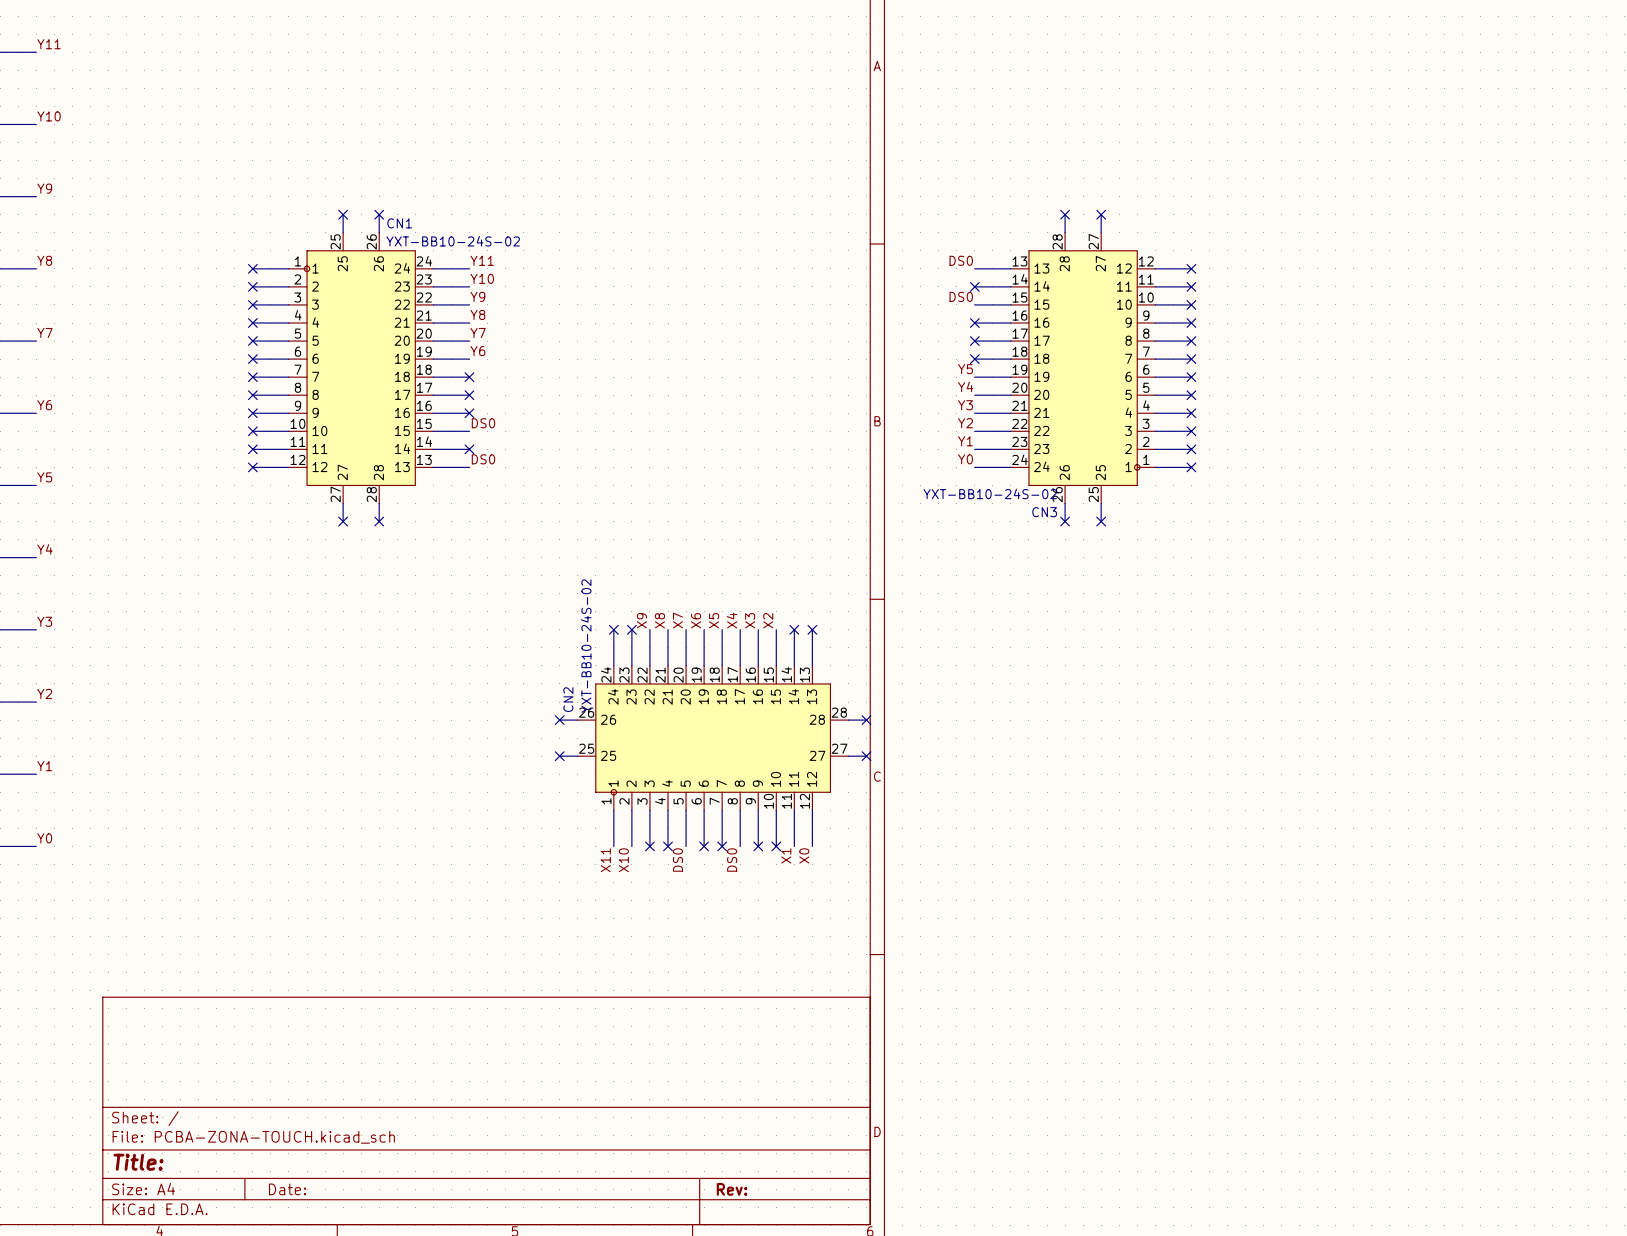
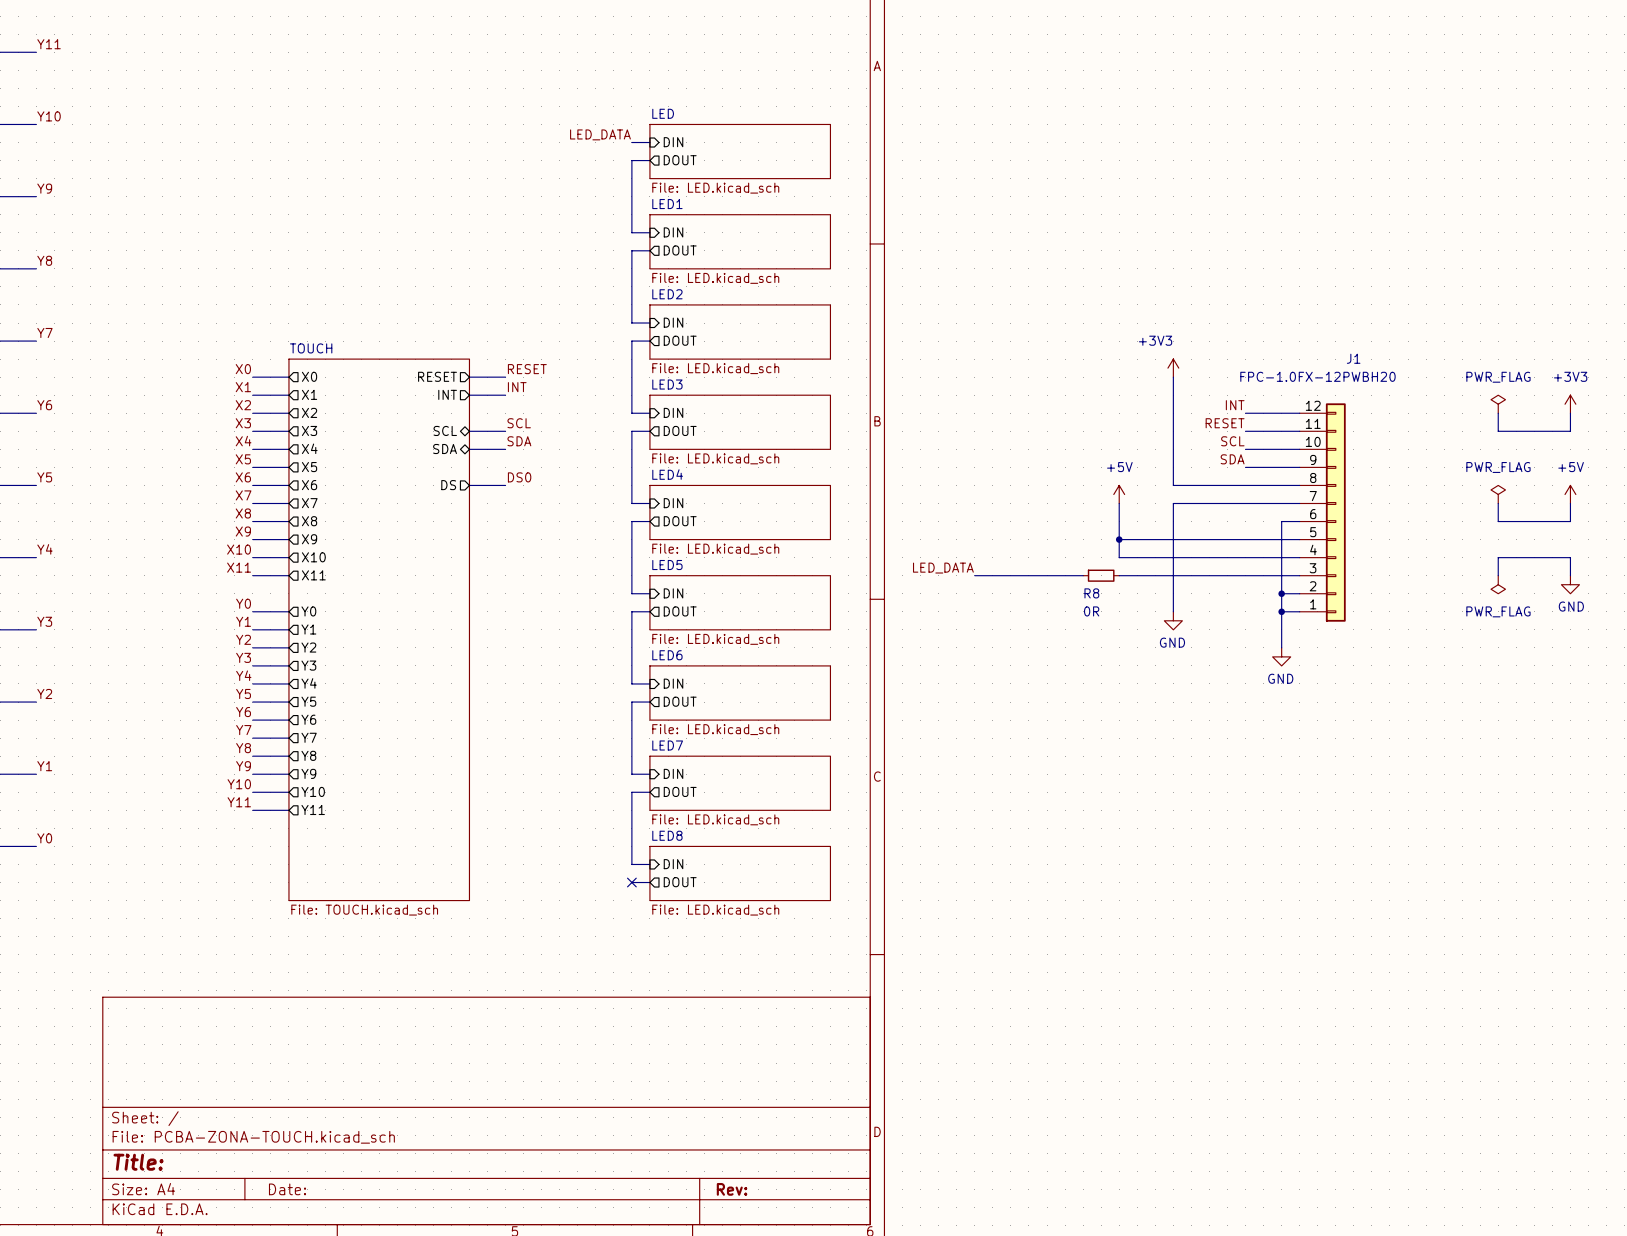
label: none -> LED_DATA (600, 134)
wire: none -> (631, 142) (649, 142)
sheet pin: none -> DIN (673, 142)
sheet LED: none -> File: LED.kicad_sch (740, 151)
wire: none -> (649, 160) (631, 160) (631, 232) (649, 232)
sheet pin: none -> DOUT (680, 160)
wire: (343, 214) (343, 232) -> none
no-connect mark: (343, 214) -> none
wire: (379, 214) (379, 232) -> none
no-connect mark: (379, 214) -> none
wire: (1065, 214) (1065, 232) -> none
no-connect mark: (1065, 214) -> none
wire: (1101, 214) (1101, 232) -> none
no-connect mark: (1101, 214) -> none
sheet pin: none -> DIN (673, 232)
sheet LED1: none -> File: LED.kicad_sch (740, 241)
wire: none -> (649, 250) (631, 250) (631, 323) (649, 323)
sheet pin: none -> DOUT (680, 250)
label: Y11 (482, 260) -> none
label: DS0 (961, 260) -> none
wire: (252, 268) (288, 268) -> none
no-connect mark: (252, 268) -> none
wire: (433, 268) (469, 268) -> none
wire: (974, 268) (1010, 268) -> none
wire: (1155, 268) (1191, 268) -> none
no-connect mark: (1191, 268) -> none
label: Y10 (482, 278) -> none
wire: (252, 286) (288, 286) -> none
no-connect mark: (252, 286) -> none
wire: (433, 286) (469, 286) -> none
wire: (974, 286) (1010, 286) -> none
no-connect mark: (974, 286) -> none
wire: (1155, 286) (1191, 286) -> none
no-connect mark: (1191, 286) -> none
label: Y9 (477, 296) -> none
label: DS0 (961, 296) -> none
wire: (252, 304) (288, 304) -> none
no-connect mark: (252, 304) -> none
wire: (433, 304) (469, 304) -> none
wire: (974, 304) (1010, 304) -> none
wire: (1155, 304) (1191, 304) -> none
no-connect mark: (1191, 304) -> none
label: Y8 (477, 314) -> none
sheet pin: none -> DIN (673, 322)
wire: (252, 323) (288, 323) -> (252, 485) (288, 485)
no-connect mark: (252, 323) -> none
wire: (433, 323) (469, 323) -> none
wire: (974, 323) (1010, 323) -> none
no-connect mark: (974, 323) -> none
wire: (1155, 323) (1191, 323) -> none
no-connect mark: (1191, 323) -> none
sheet LED2: none -> File: LED.kicad_sch (740, 332)
label: Y7 (478, 333) -> none
sheet pin: none -> DOUT (680, 340)
wire: (252, 341) (288, 341) -> (252, 503) (288, 503)
no-connect mark: (252, 341) -> none
wire: (433, 341) (469, 341) -> none
wire: none -> (649, 341) (631, 341) (631, 413) (649, 413)
wire: (974, 341) (1010, 341) -> none
no-connect mark: (974, 341) -> none
wire: (1155, 341) (1191, 341) -> none
no-connect mark: (1191, 341) -> none
label: Y6 (477, 351) -> none
wire: (252, 359) (288, 359) -> (252, 521) (288, 521)
no-connect mark: (252, 359) -> none
wire: (974, 359) (1010, 359) -> none
no-connect mark: (974, 359) -> none
wire: (1155, 359) (1191, 359) -> none
no-connect mark: (1191, 359) -> none
CN1: YXT-BB10-24S-02 (361, 368) -> none
CN3: YXT-BB10-24S-02 (1083, 368) -> none
power symbol: none -> +3V3 (1173, 368)
label: none -> X0 (243, 369)
label: none -> RESET (527, 369)
label: Y5 (965, 369) -> none
sheet pin: none -> X0 (309, 376)
sheet pin: none -> RESET (437, 376)
no-connect mark: (252, 377) -> none
wire: (433, 377) (469, 377) -> (505, 377) (469, 377)
no-connect mark: (469, 377) -> none
wire: (974, 377) (1010, 377) -> none
wire: (1155, 377) (1191, 377) -> none
wire: none -> (1173, 377) (1173, 485) (1299, 485)
no-connect mark: (1191, 377) -> none
label: Y4 (965, 386) -> none
label: none -> X1 (243, 387)
label: none -> INT (517, 387)
sheet pin: none -> X1 (309, 394)
sheet pin: none -> INT (447, 394)
no-connect mark: (252, 395) -> none
wire: (433, 395) (469, 395) -> (505, 395) (469, 395)
no-connect mark: (469, 395) -> none
wire: (974, 395) (1010, 395) -> none
wire: (1155, 395) (1191, 395) -> none
no-connect mark: (1191, 395) -> none
power symbol: none -> PWR_FLAG (1498, 404)
power symbol: none -> +3V3 (1570, 404)
label: none -> X2 (243, 405)
label: Y3 (965, 405) -> none
label: none -> INT (1235, 405)
sheet pin: none -> X2 (309, 412)
sheet pin: none -> DIN (673, 412)
no-connect mark: (252, 413) -> none
wire: (433, 413) (469, 413) -> none
no-connect mark: (469, 413) -> none
wire: (974, 413) (1010, 413) -> none
wire: (1155, 413) (1191, 413) -> none
no-connect mark: (1191, 413) -> none
wire: none -> (1245, 413) (1299, 413)
wire: none -> (1498, 413) (1498, 431) (1570, 431) (1570, 413)
sheet LED3: none -> File: LED.kicad_sch (740, 422)
label: none -> X3 (243, 423)
label: DS0 (483, 423) -> none
label: none -> SCL (519, 423)
label: Y2 (965, 423) -> none
label: none -> RESET (1225, 423)
sheet pin: none -> X3 (309, 430)
sheet pin: none -> SCL (445, 430)
sheet pin: none -> DOUT (680, 430)
no-connect mark: (252, 431) -> none
wire: (433, 431) (469, 431) -> (505, 431) (469, 431)
wire: none -> (649, 431) (631, 431) (631, 503) (649, 503)
wire: (974, 431) (1010, 431) -> none
wire: (1155, 431) (1191, 431) -> none
no-connect mark: (1191, 431) -> none
wire: none -> (1245, 431) (1299, 431)
label: none -> X4 (243, 441)
label: none -> SDA (519, 441)
label: Y1 (965, 441) -> none
label: none -> SCL (1232, 441)
sheet pin: none -> X4 (309, 448)
no-connect mark: (252, 449) -> none
wire: (433, 449) (469, 449) -> (505, 449) (469, 449)
sheet pin: none -> SDA (445, 449)
no-connect mark: (469, 449) -> none
wire: (974, 449) (1010, 449) -> none
wire: (1155, 449) (1191, 449) -> none
no-connect mark: (1191, 449) -> none
wire: none -> (1245, 449) (1299, 449)
label: none -> X5 (243, 459)
label: DS0 (483, 459) -> none
label: Y0 (965, 459) -> none
label: none -> SDA (1232, 459)
no-connect mark: (252, 467) -> none
sheet pin: none -> X5 (309, 467)
wire: (433, 467) (469, 467) -> (469, 485) (505, 485)
wire: (974, 467) (1010, 467) -> none
wire: (1155, 467) (1191, 467) -> none
no-connect mark: (1191, 467) -> none
wire: none -> (1245, 467) (1299, 467)
label: none -> X6 (243, 477)
label: none -> DS0 (519, 477)
sheet pin: none -> X6 (309, 485)
sheet pin: none -> DS (448, 485)
power symbol: none -> +5V (1119, 494)
power symbol: none -> PWR_FLAG (1498, 494)
power symbol: none -> +5V (1570, 494)
label: none -> X7 (243, 495)
sheet pin: none -> X7 (309, 503)
wire: (343, 503) (343, 521) -> none
wire: (379, 503) (379, 521) -> none
sheet pin: none -> DIN (673, 503)
wire: (1065, 503) (1065, 521) -> none
wire: (1101, 503) (1101, 521) -> none
wire: none -> (1119, 503) (1119, 557) (1299, 557)
wire: none -> (1299, 503) (1173, 503) (1173, 611)
wire: none -> (1498, 503) (1498, 521) (1570, 521) (1570, 503)
sheet LED4: none -> File: LED.kicad_sch (740, 512)
J1: none -> FPC-1.0FX-12PWBH20 (1322, 512)
label: none -> X8 (243, 513)
sheet pin: none -> X8 (309, 521)
no-connect mark: (343, 521) -> none
no-connect mark: (379, 521) -> none
wire: none -> (649, 521) (631, 521) (631, 593) (649, 593)
sheet pin: none -> DOUT (680, 521)
no-connect mark: (1065, 521) -> none
no-connect mark: (1101, 521) -> none
wire: none -> (1299, 521) (1281, 521) (1281, 647)
label: none -> X9 (243, 531)
wire: none -> (252, 539) (288, 539)
sheet pin: none -> X9 (309, 539)
wire: none -> (1119, 539) (1299, 539)
junction: none -> (1119, 539)
label: none -> X10 (239, 549)
wire: none -> (252, 557) (288, 557)
sheet pin: none -> X10 (313, 557)
label: none -> X11 (239, 567)
label: none -> LED_DATA (943, 568)
wire: none -> (252, 575) (288, 575)
sheet pin: none -> X11 (313, 575)
wire: none -> (974, 575) (1083, 575)
R8: none -> 0R (1101, 575)
wire: none -> (1119, 575) (1299, 575)
wire: none -> (1498, 575) (1498, 557) (1570, 557) (1570, 575)
power symbol: none -> PWR_FLAG (1498, 584)
power symbol: none -> GND (1570, 584)
sheet pin: none -> DIN (673, 593)
wire: none -> (1281, 593) (1299, 593)
junction: none -> (1281, 593)
sheet LED5: none -> File: LED.kicad_sch (740, 602)
label: none -> Y0 (243, 603)
wire: none -> (252, 611) (288, 611)
sheet pin: none -> Y0 (308, 611)
wire: none -> (649, 611) (631, 611) (631, 629)
sheet pin: none -> DOUT (680, 611)
wire: none -> (1281, 611) (1299, 611)
junction: none -> (1281, 611)
label: X9 (641, 620) -> none
label: X8 (659, 620) -> none
label: X7 (677, 620) -> none
label: X6 (696, 620) -> none
label: X5 (714, 620) -> none
label: X4 (731, 620) -> none
label: X3 (750, 620) -> none
label: X2 (768, 620) -> none
power symbol: none -> GND (1173, 620)
label: none -> Y1 (243, 621)
wire: none -> (252, 629) (288, 629)
sheet pin: none -> Y1 (308, 629)
sheet TOUCH: none -> File: TOUCH.kicad_sch (379, 629)
wire: (613, 629) (613, 665) -> none
no-connect mark: (613, 629) -> none
no-connect mark: (631, 629) -> none
wire: (649, 629) (649, 665) -> none
wire: (668, 629) (668, 665) -> none
wire: (686, 629) (686, 665) -> none
wire: (704, 629) (704, 665) -> none
wire: (722, 629) (722, 665) -> none
wire: (740, 629) (740, 665) -> none
wire: (758, 629) (758, 665) -> none
wire: (776, 629) (776, 665) -> none
wire: (794, 629) (794, 665) -> none
no-connect mark: (794, 629) -> none
wire: (812, 629) (812, 665) -> none
no-connect mark: (812, 629) -> none
label: none -> Y2 (243, 639)
wire: none -> (252, 647) (288, 647)
sheet pin: none -> Y2 (308, 647)
power symbol: none -> GND (1281, 656)
label: none -> Y3 (243, 657)
wire: none -> (252, 665) (288, 665)
sheet pin: none -> Y3 (308, 665)
label: none -> Y4 (243, 675)
wire: none -> (252, 683) (288, 683)
sheet pin: none -> Y4 (309, 683)
sheet pin: none -> DIN (673, 683)
label: none -> Y5 (243, 693)
sheet LED6: none -> File: LED.kicad_sch (740, 693)
sheet pin: none -> Y5 (308, 701)
sheet pin: none -> DOUT (680, 701)
wire: none -> (252, 702) (288, 702)
label: none -> Y6 (243, 712)
sheet pin: none -> Y6 (308, 719)
wire: none -> (252, 720) (288, 720)
wire: (559, 720) (577, 720) -> none
no-connect mark: (559, 720) -> none
wire: (848, 720) (866, 720) -> none
no-connect mark: (866, 720) -> none
label: none -> Y7 (243, 730)
sheet pin: none -> Y7 (309, 737)
wire: none -> (252, 738) (288, 738)
CN2: YXT-BB10-24S-02 (713, 738) -> none
label: none -> Y8 (243, 748)
sheet pin: none -> Y8 (308, 755)
wire: none -> (252, 756) (288, 756)
wire: (559, 756) (577, 756) -> (631, 882) (649, 882)
no-connect mark: (559, 756) -> none
wire: (848, 756) (866, 756) -> none
no-connect mark: (866, 756) -> none
label: none -> Y9 (243, 766)
sheet pin: none -> Y9 (308, 773)
sheet pin: none -> DIN (673, 773)
wire: none -> (252, 774) (288, 774)
sheet LED7: none -> File: LED.kicad_sch (740, 783)
label: none -> Y10 (239, 784)
sheet pin: none -> Y10 (313, 791)
sheet pin: none -> DOUT (680, 791)
wire: none -> (252, 792) (288, 792)
label: none -> Y11 (239, 802)
sheet pin: none -> Y11 (313, 809)
wire: none -> (252, 810) (288, 810)
wire: (613, 810) (613, 846) -> none
wire: (649, 810) (649, 846) -> none
wire: (668, 810) (668, 846) -> none
wire: (686, 810) (686, 846) -> none
wire: (704, 810) (704, 846) -> none
wire: (722, 810) (722, 846) -> none
wire: (740, 810) (740, 846) -> none
wire: (758, 810) (758, 846) -> none
wire: (776, 810) (776, 846) -> none
wire: (794, 810) (794, 846) -> none
wire: (812, 810) (812, 846) -> none
wire: none -> (631, 846) (631, 864) (649, 864)
no-connect mark: (649, 846) -> none
no-connect mark: (668, 846) -> none
no-connect mark: (704, 846) -> none
no-connect mark: (722, 846) -> none
no-connect mark: (758, 846) -> none
no-connect mark: (776, 846) -> none
label: X1 (786, 855) -> none
label: X0 (804, 855) -> none
label: X11 (605, 860) -> none
label: X10 (623, 860) -> none
label: DS0 (677, 860) -> none
label: DS0 (732, 860) -> none
sheet pin: none -> DIN (673, 864)
sheet LED8: none -> File: LED.kicad_sch (740, 873)
no-connect mark: none -> (631, 882)
sheet pin: none -> DOUT (680, 882)

